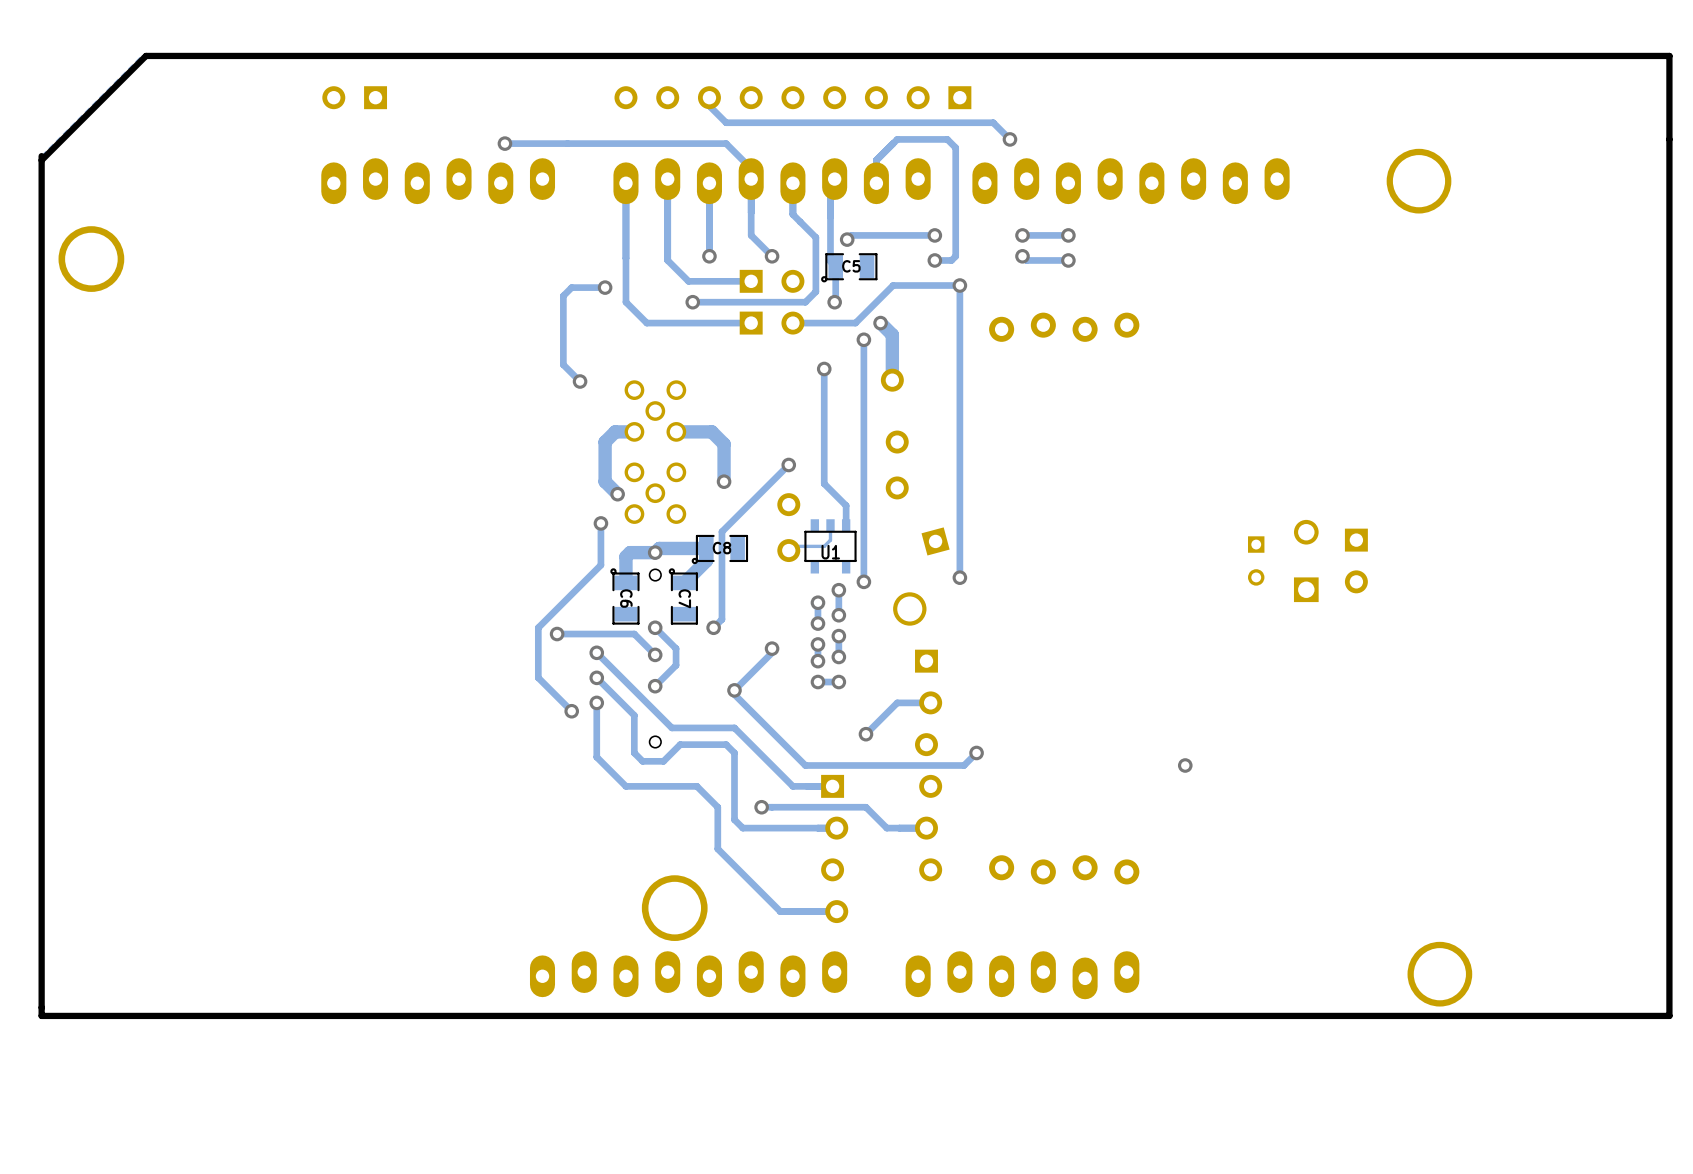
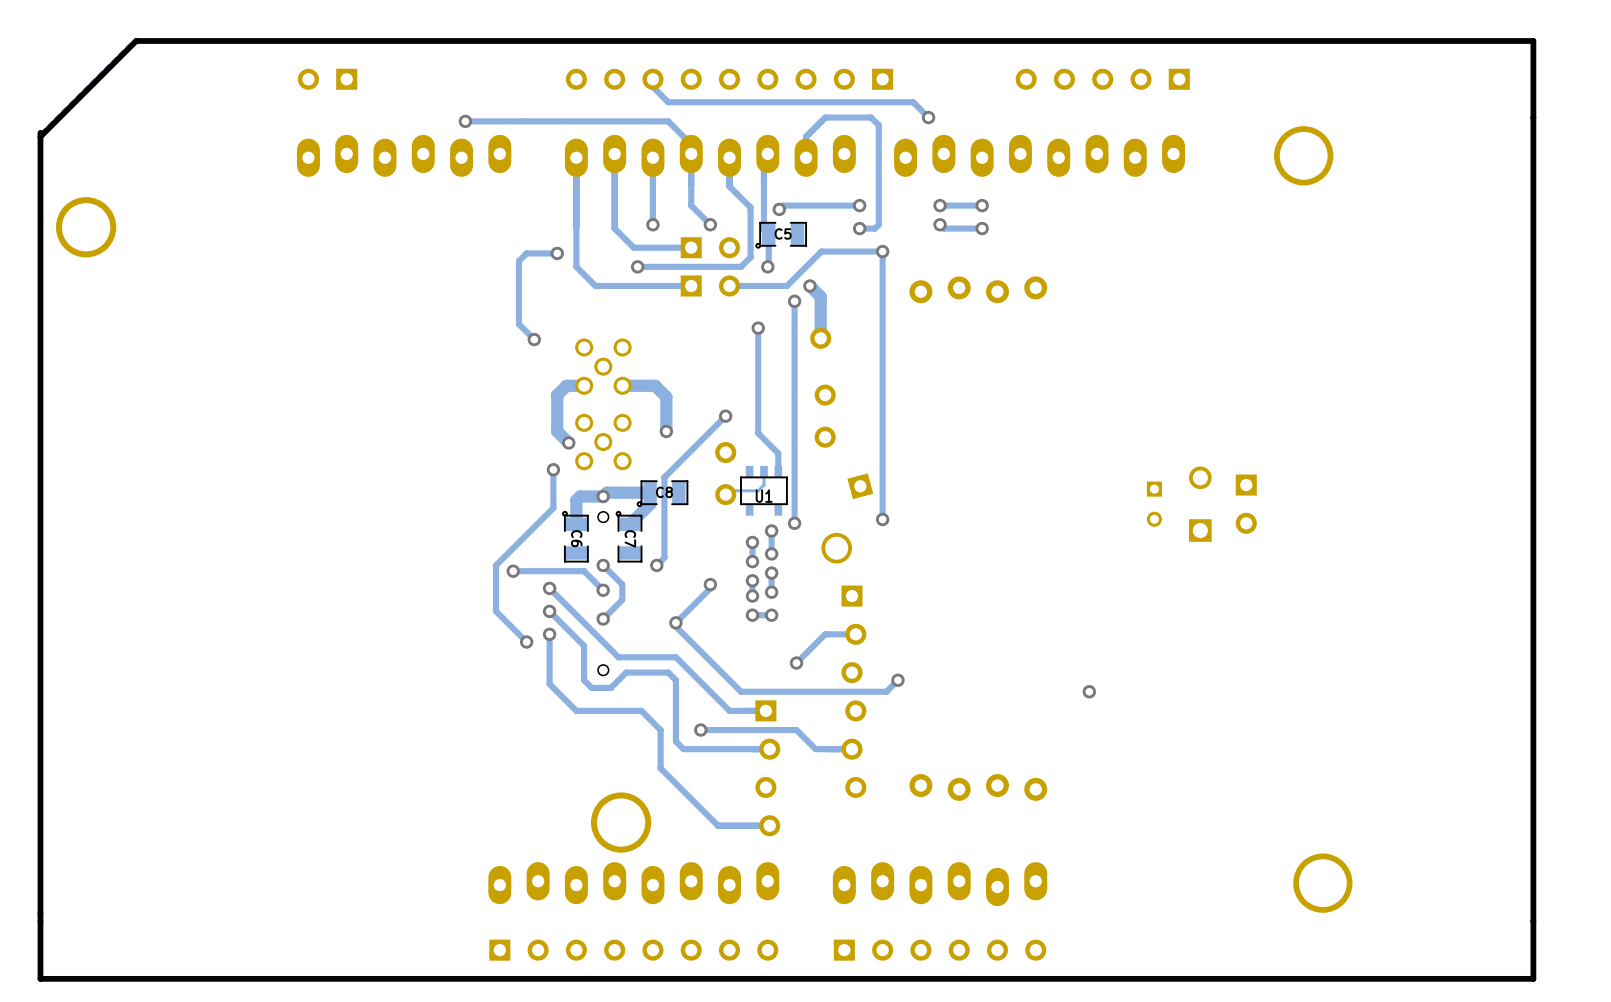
part: none -> (1102, 79)
board edge: (1669, 1015) (41, 1015) -> (1533, 921) (1533, 978) (40, 978) (40, 921)
part: none -> (633, 950)
part: none -> (940, 950)

